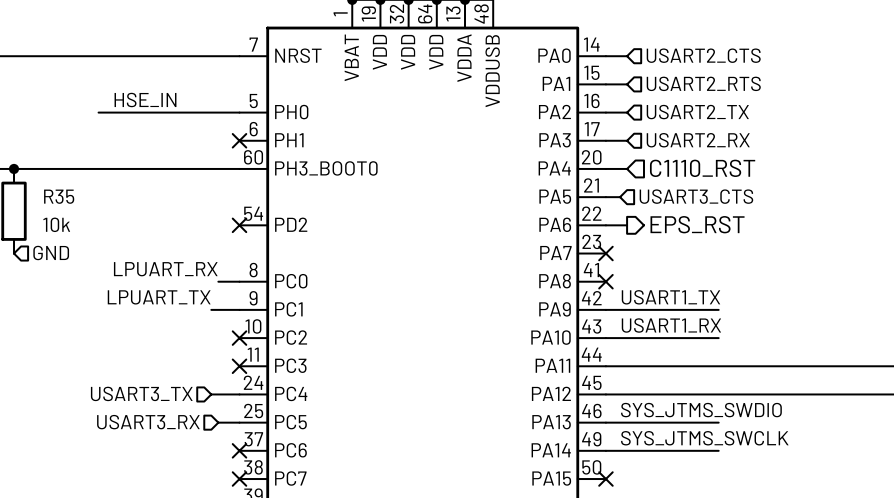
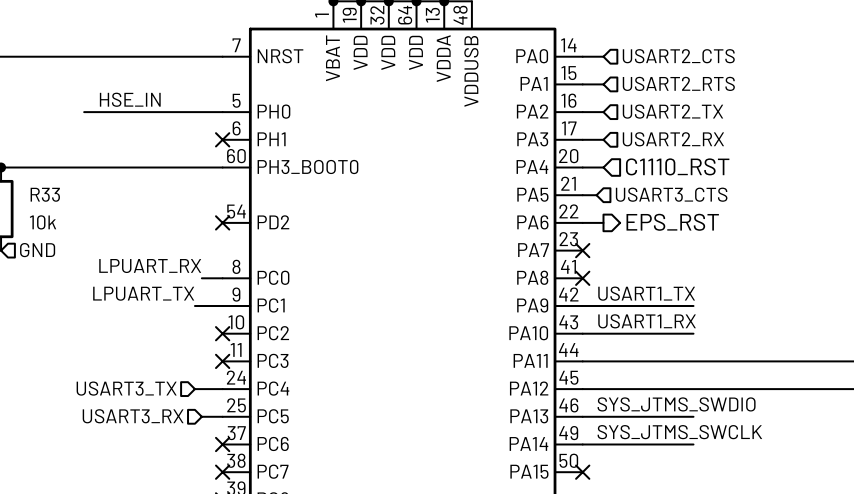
R35 name: R35 (59, 196) -> R33 (45, 194)

